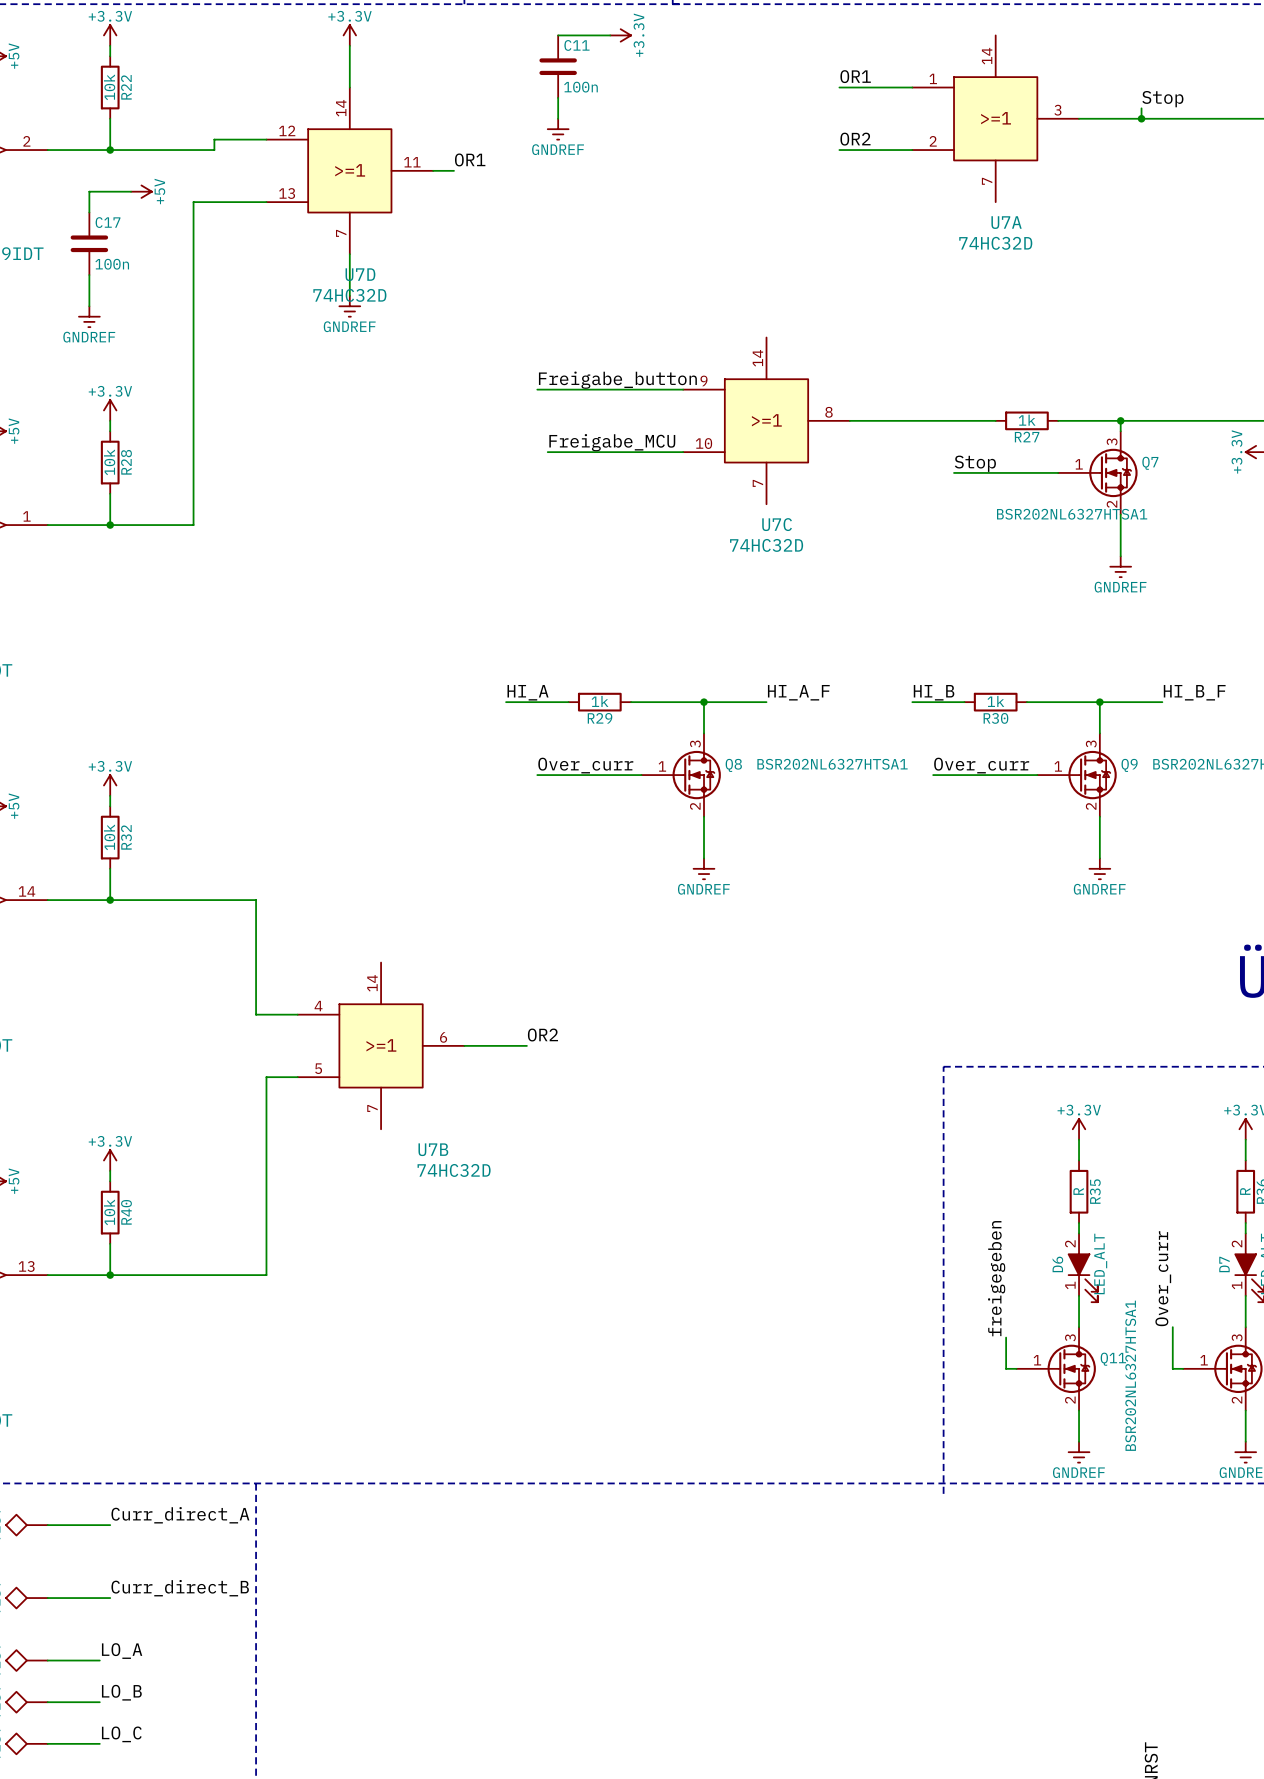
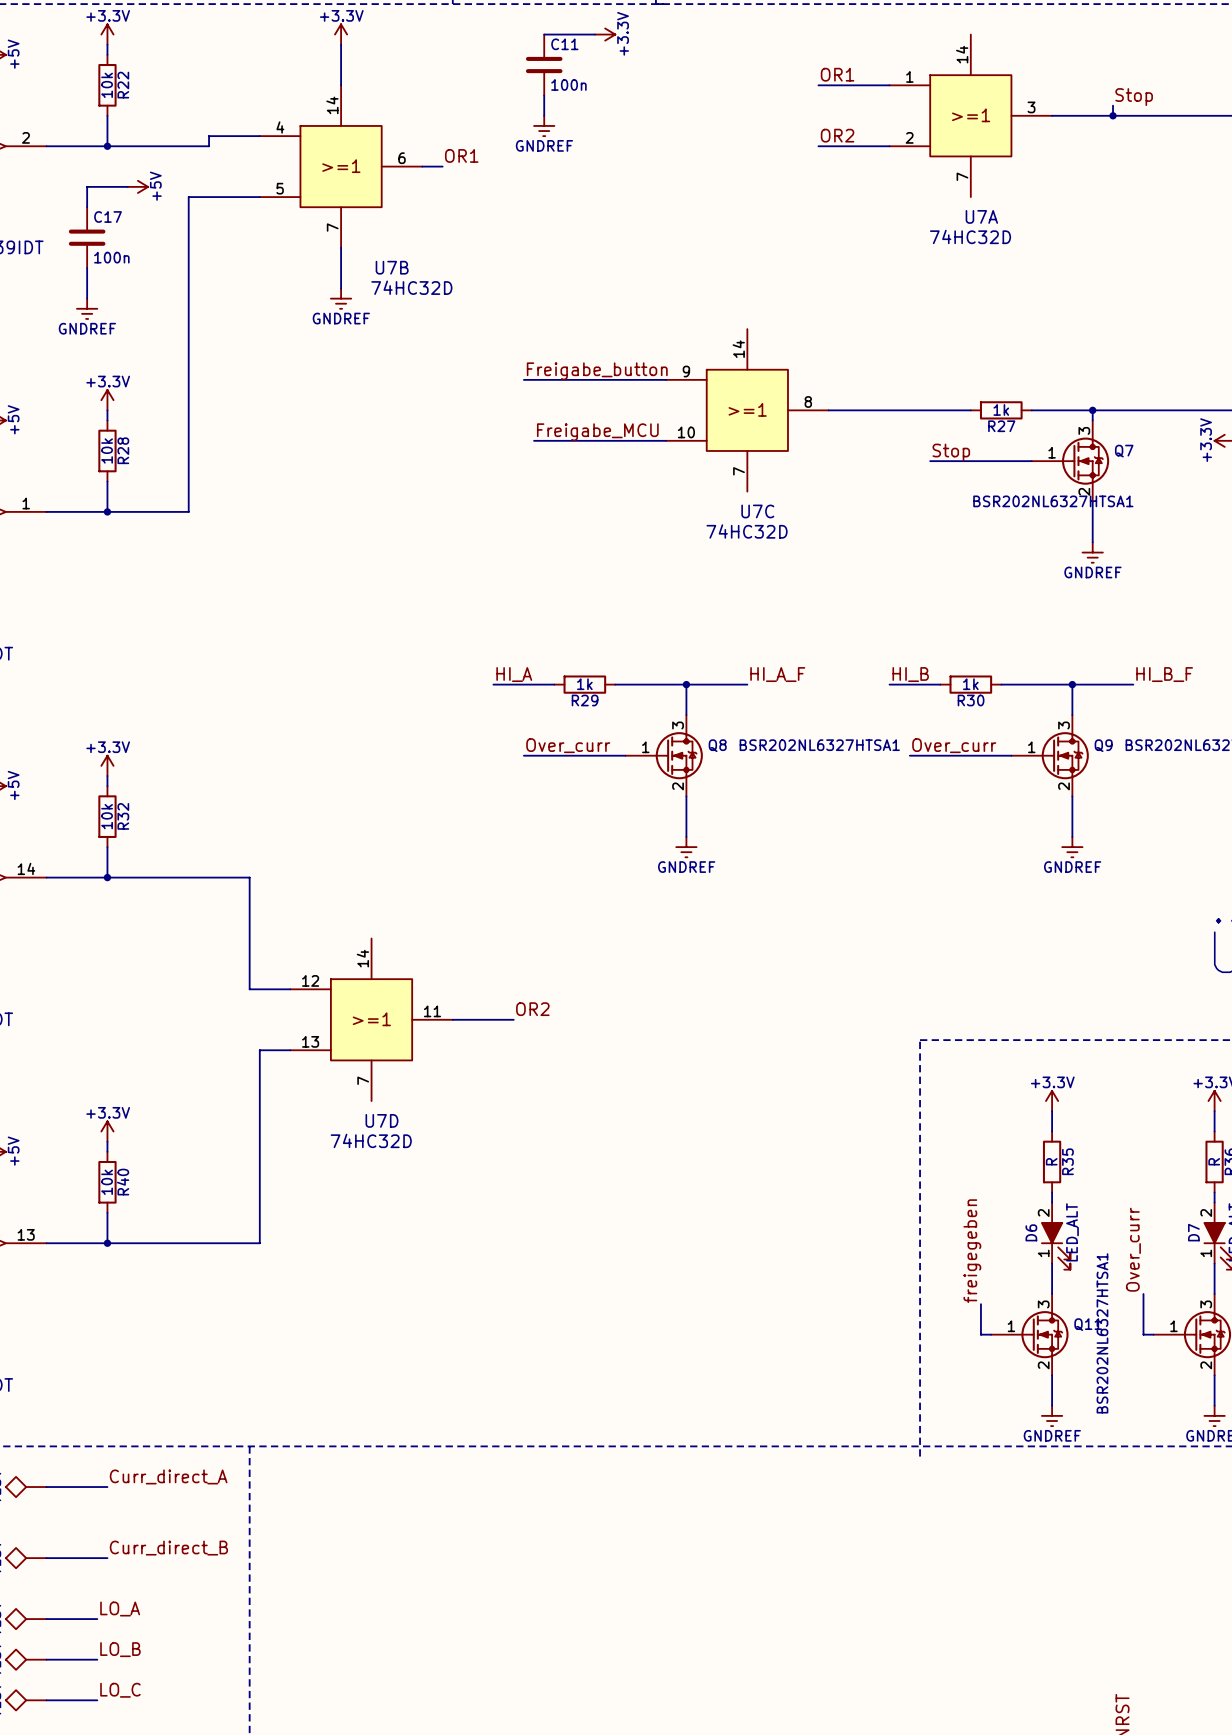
U7D position: (349, 170) -> (371, 1019)
U7B position: (381, 1045) -> (341, 166)

